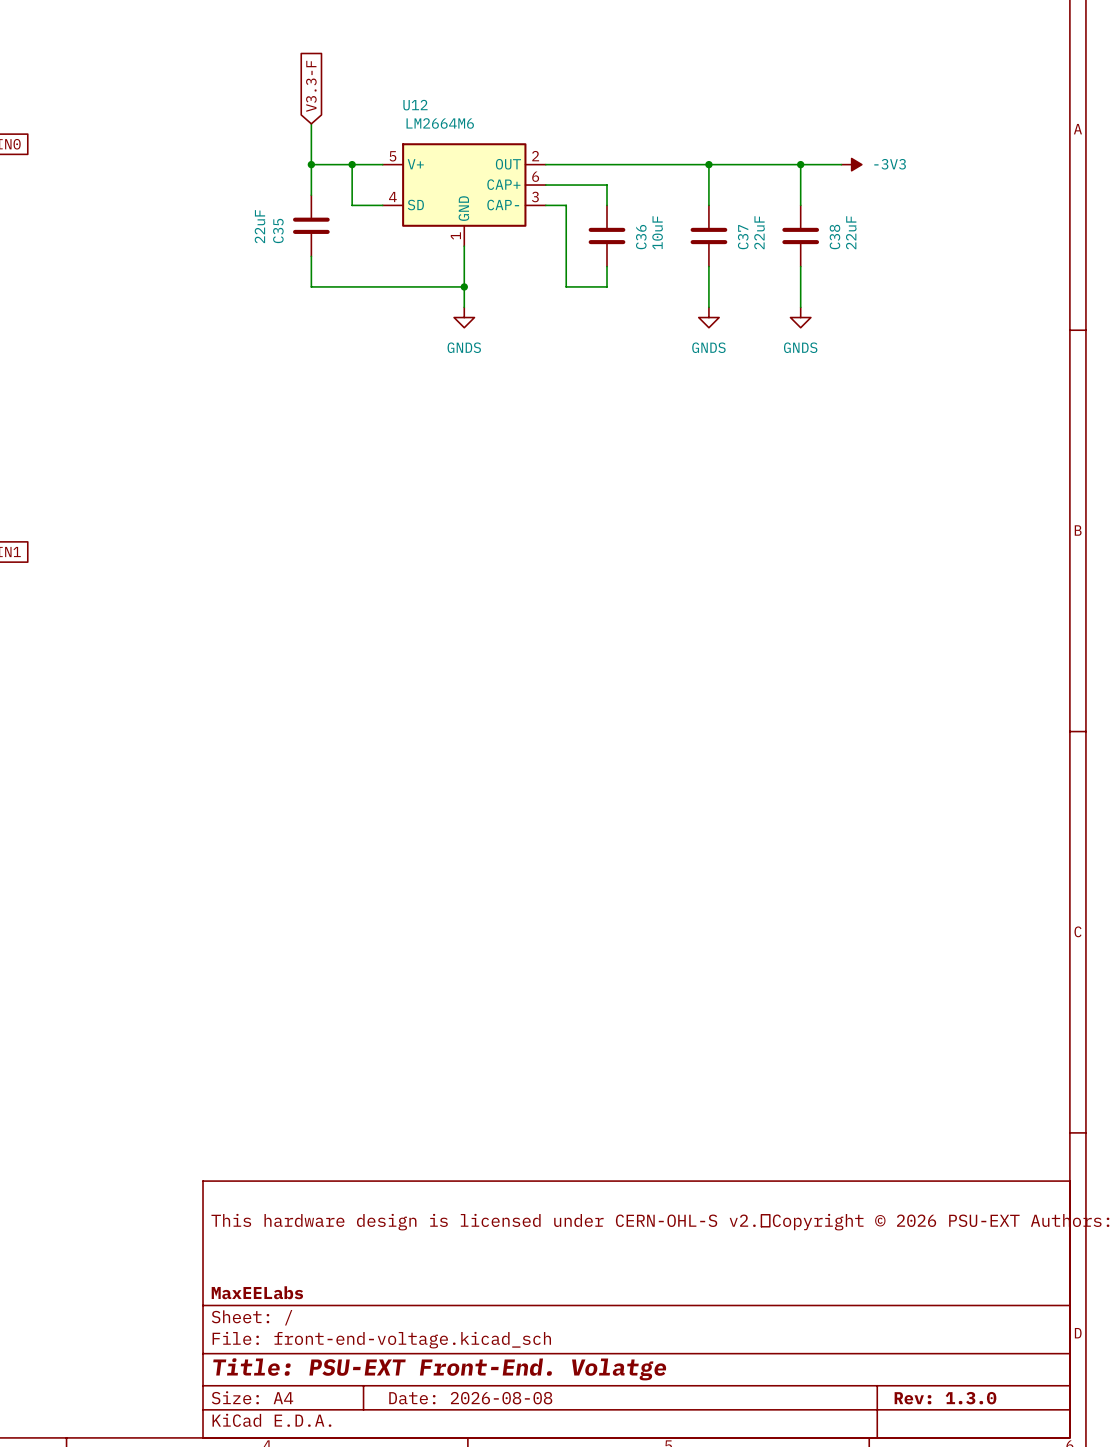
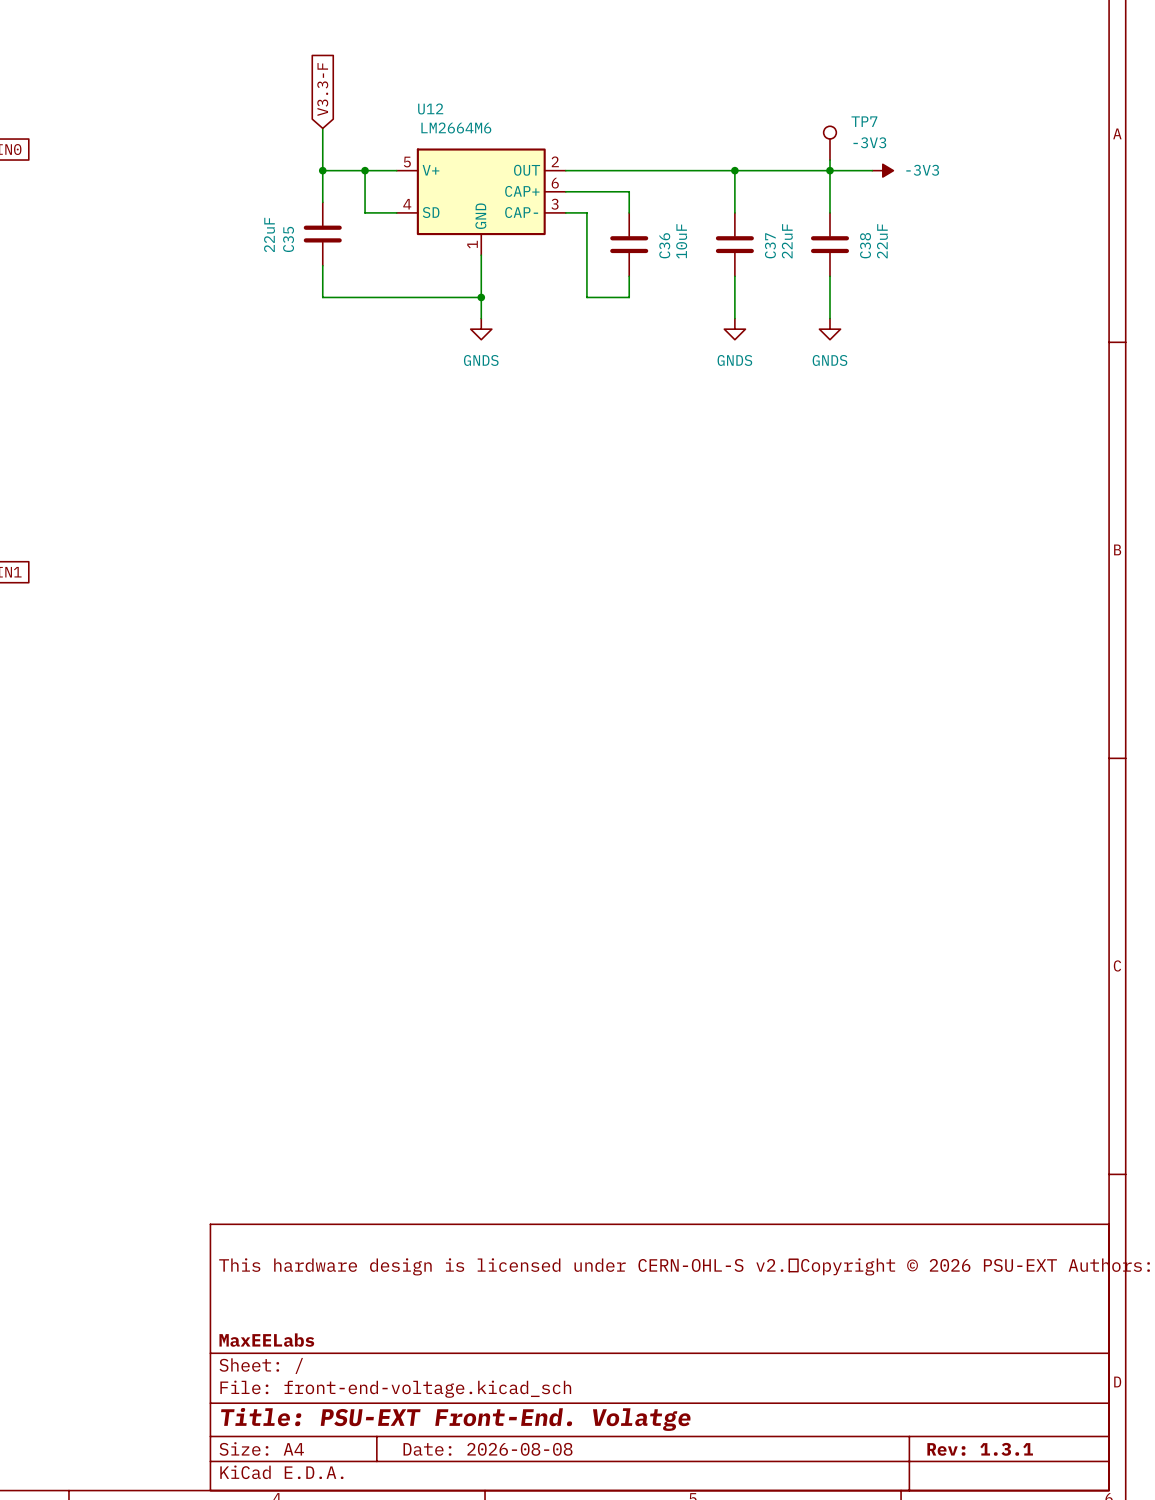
TP7: none -> -3V3 (829, 143)
wire: none -> (829, 160) (829, 170)
title block: Rev: 1.3.0 (945, 1398) -> Rev: 1.3.1 (980, 1449)

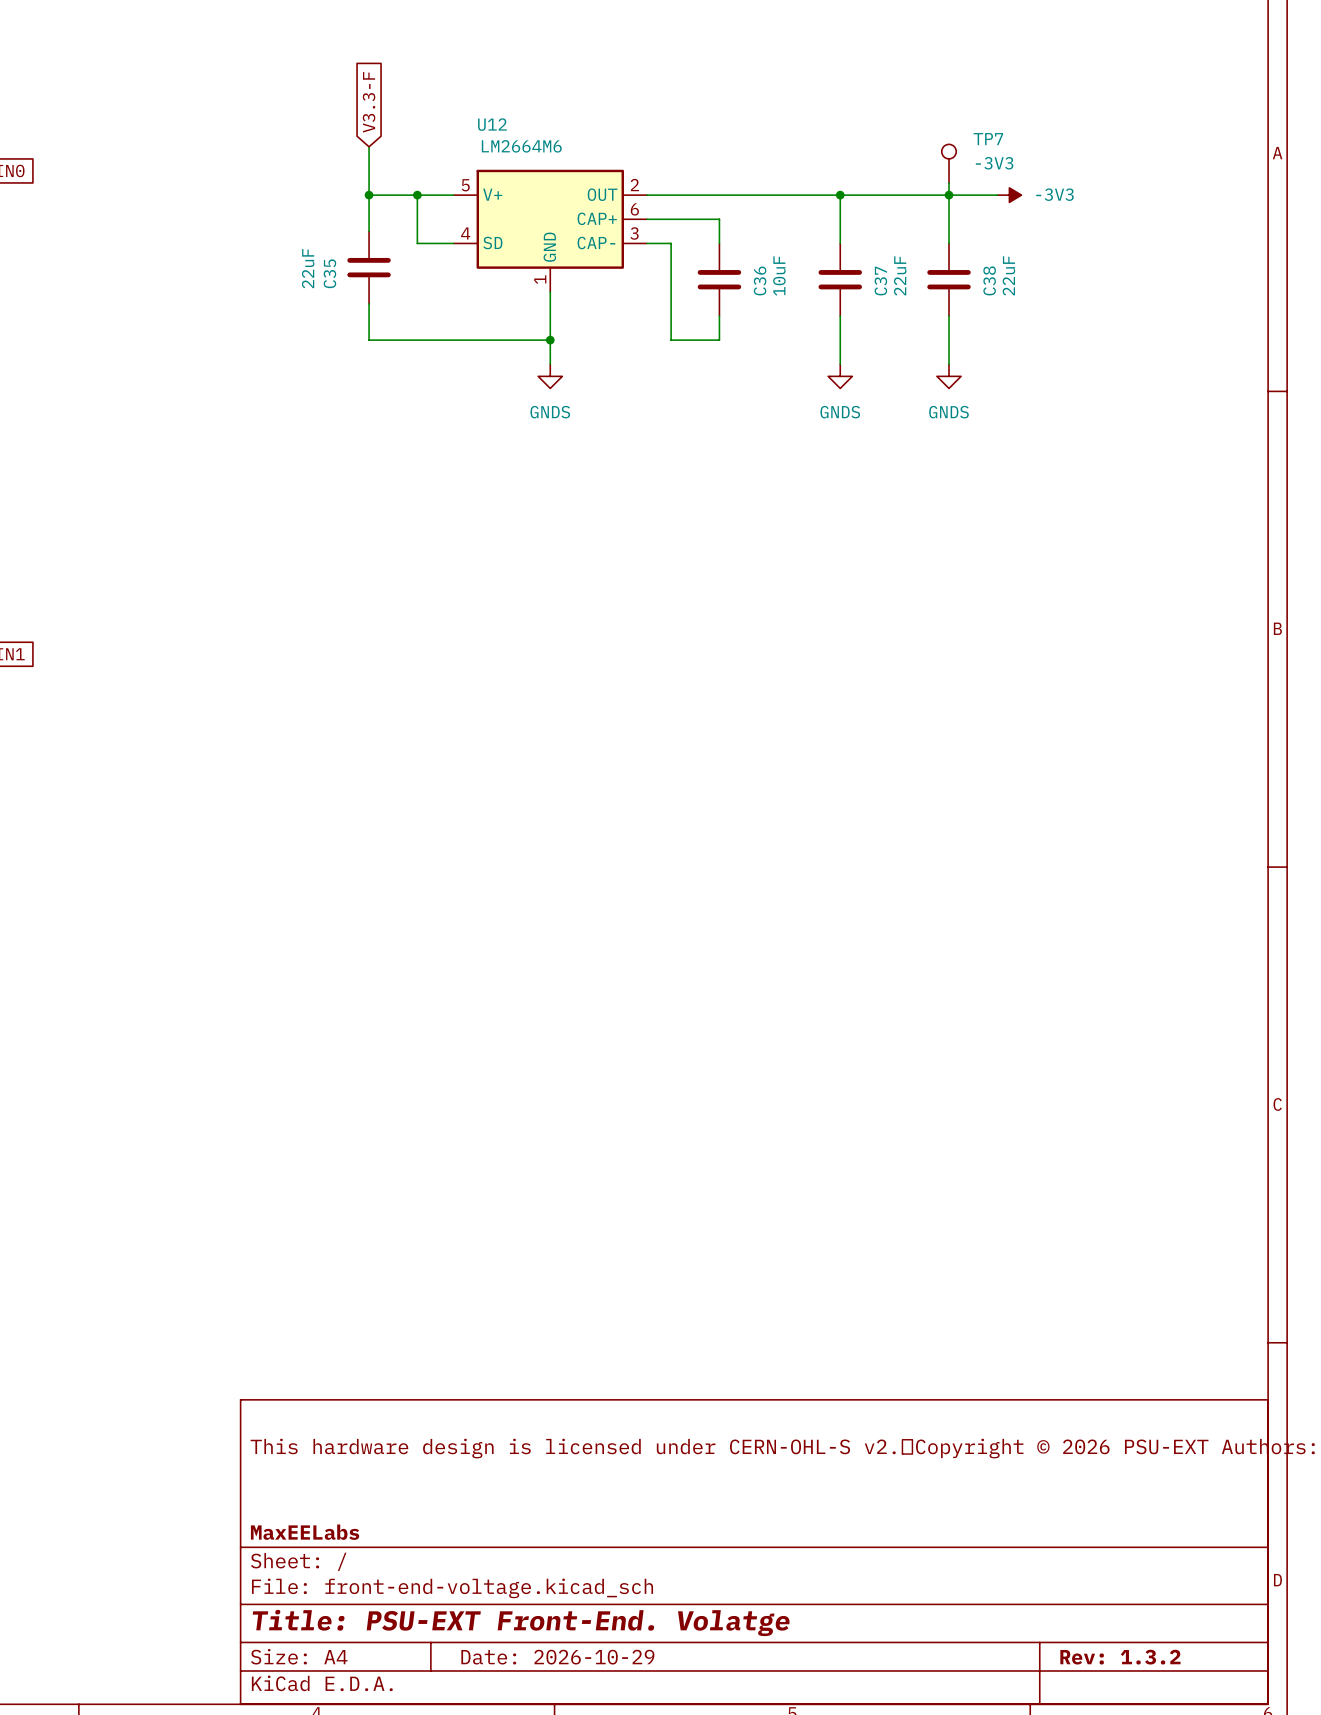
title block: Date: 2026-08-08 (488, 1449) -> Date: 2026-10-29 (557, 1657)
title block: Rev: 1.3.1 (980, 1449) -> Rev: 1.3.2 (1120, 1657)

